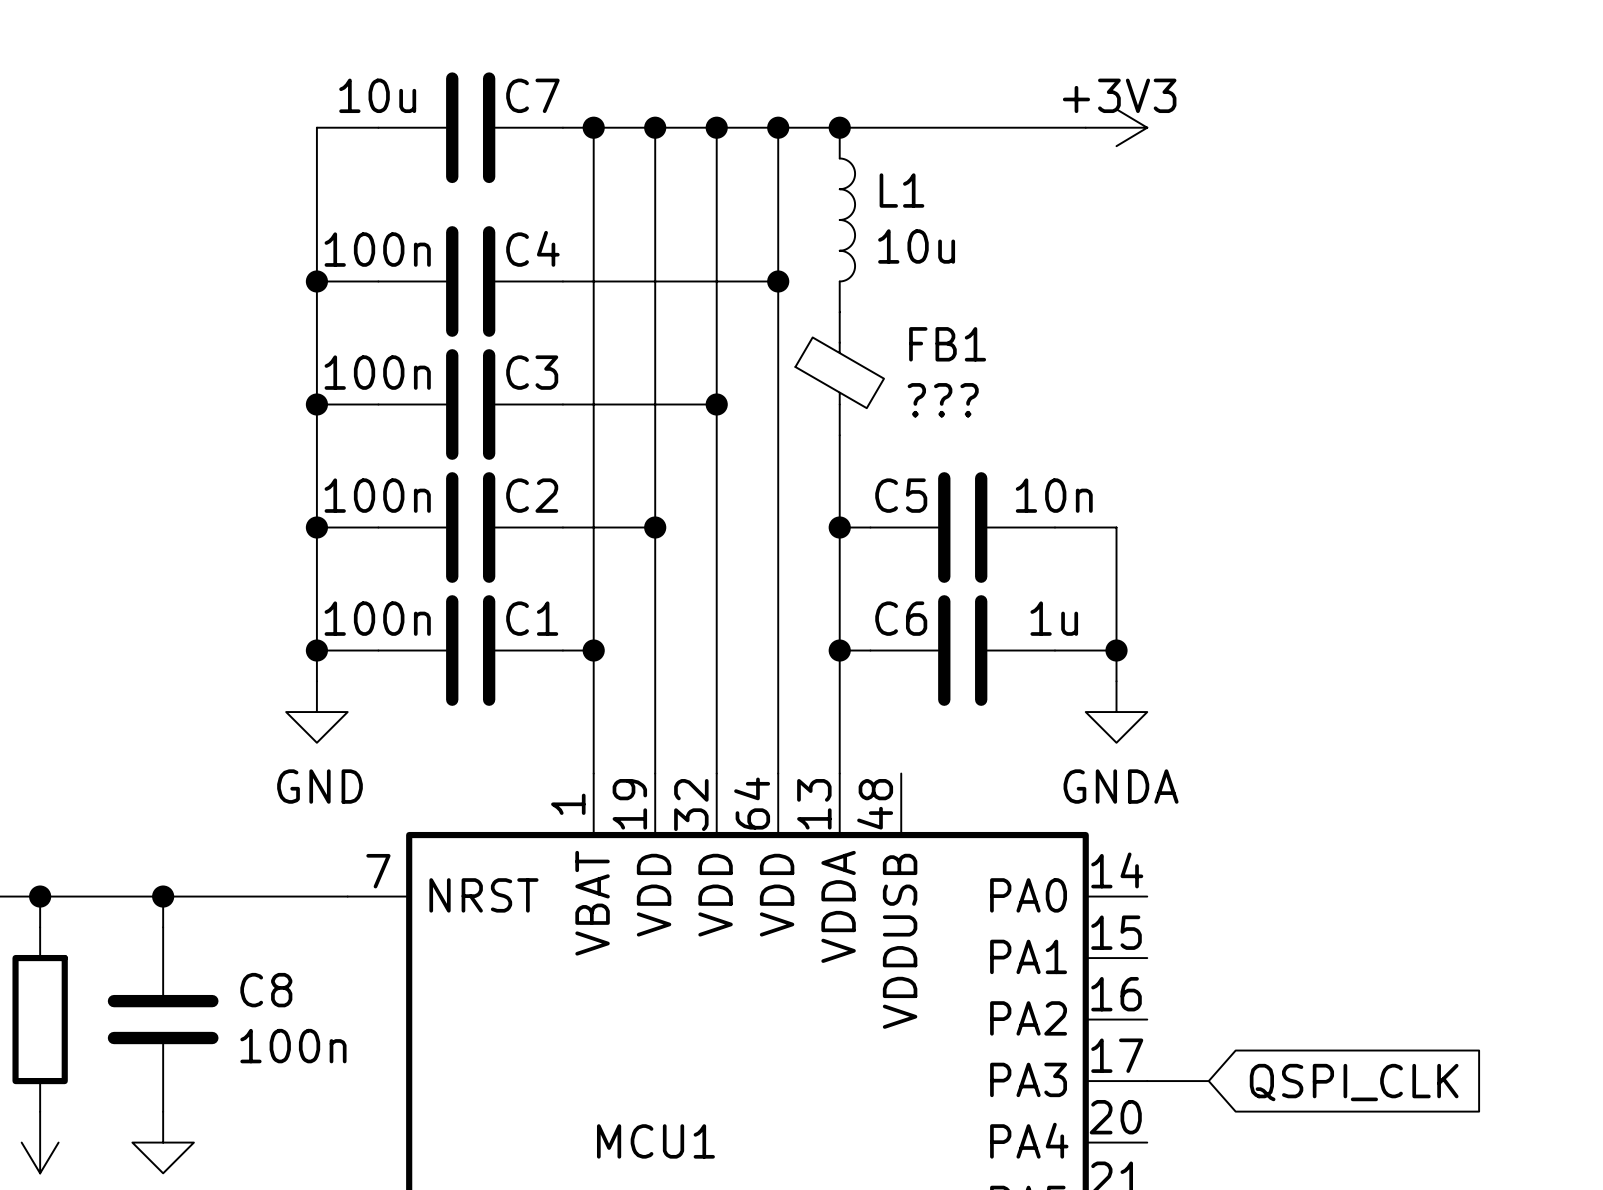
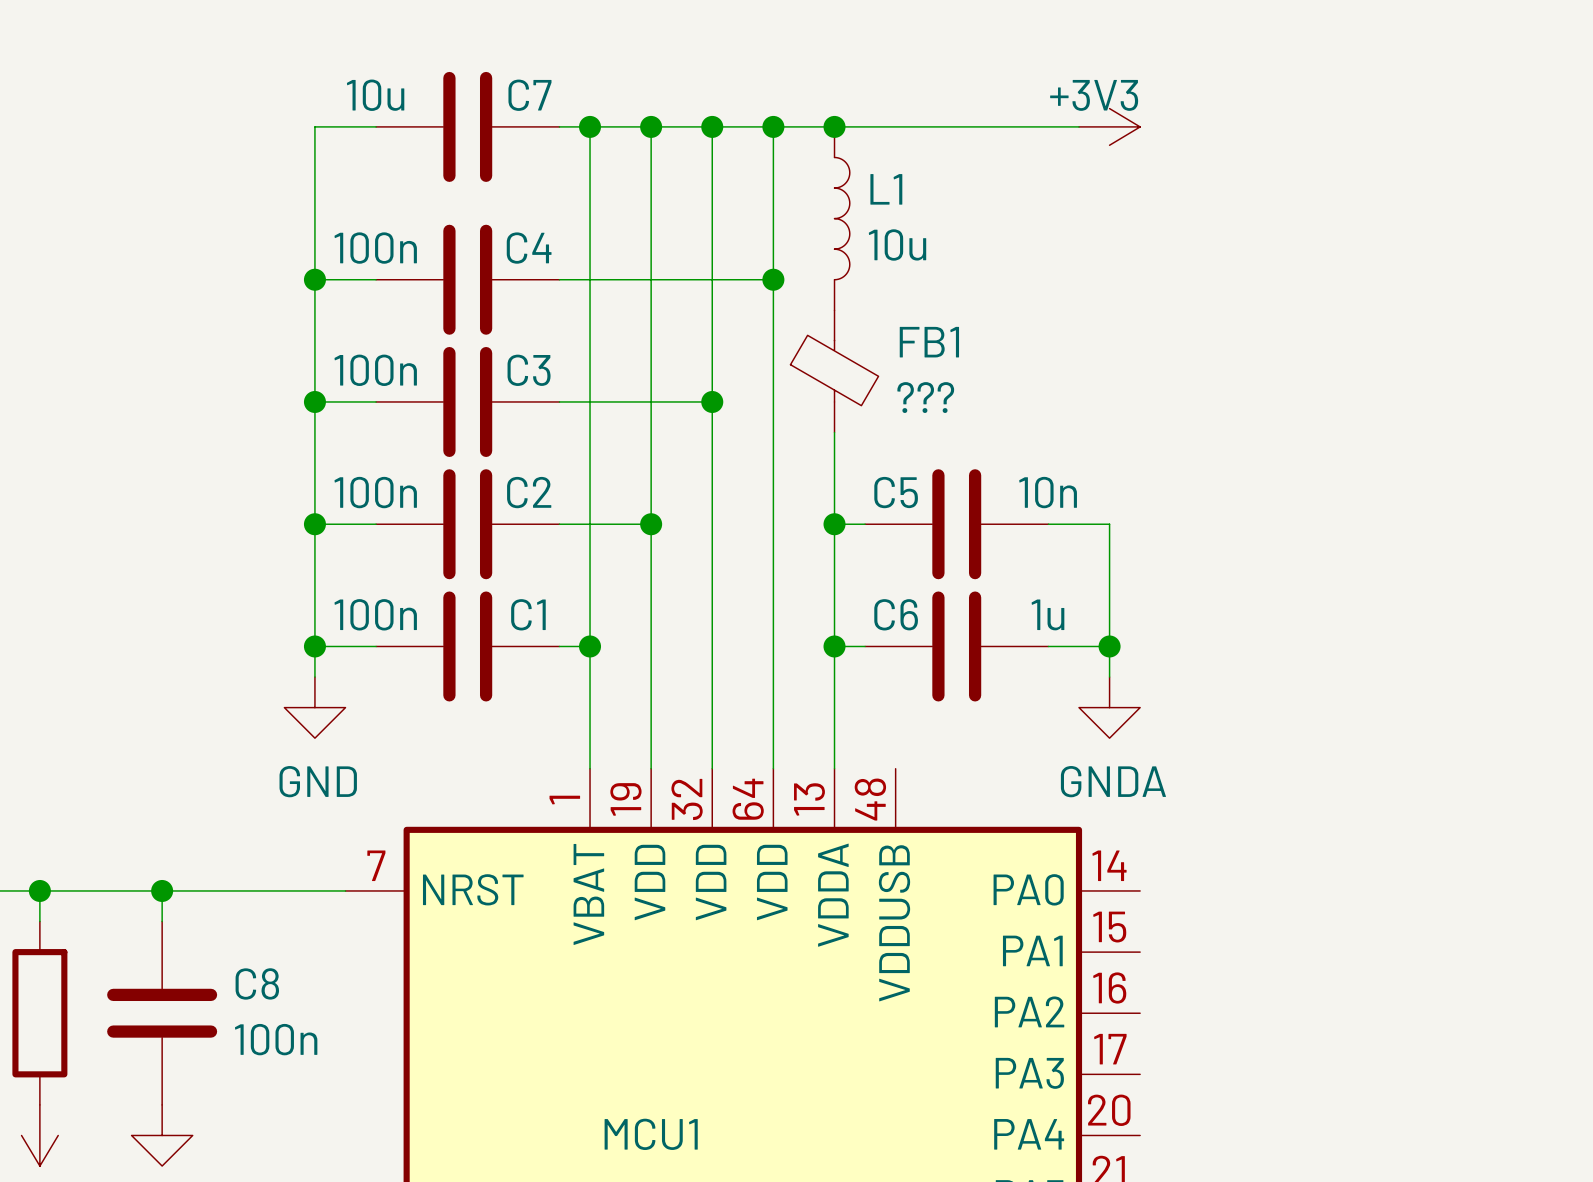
wire: (1147, 1081) (1208, 1081) -> none
global label: QSPI_CLK (1354, 1082) -> none

